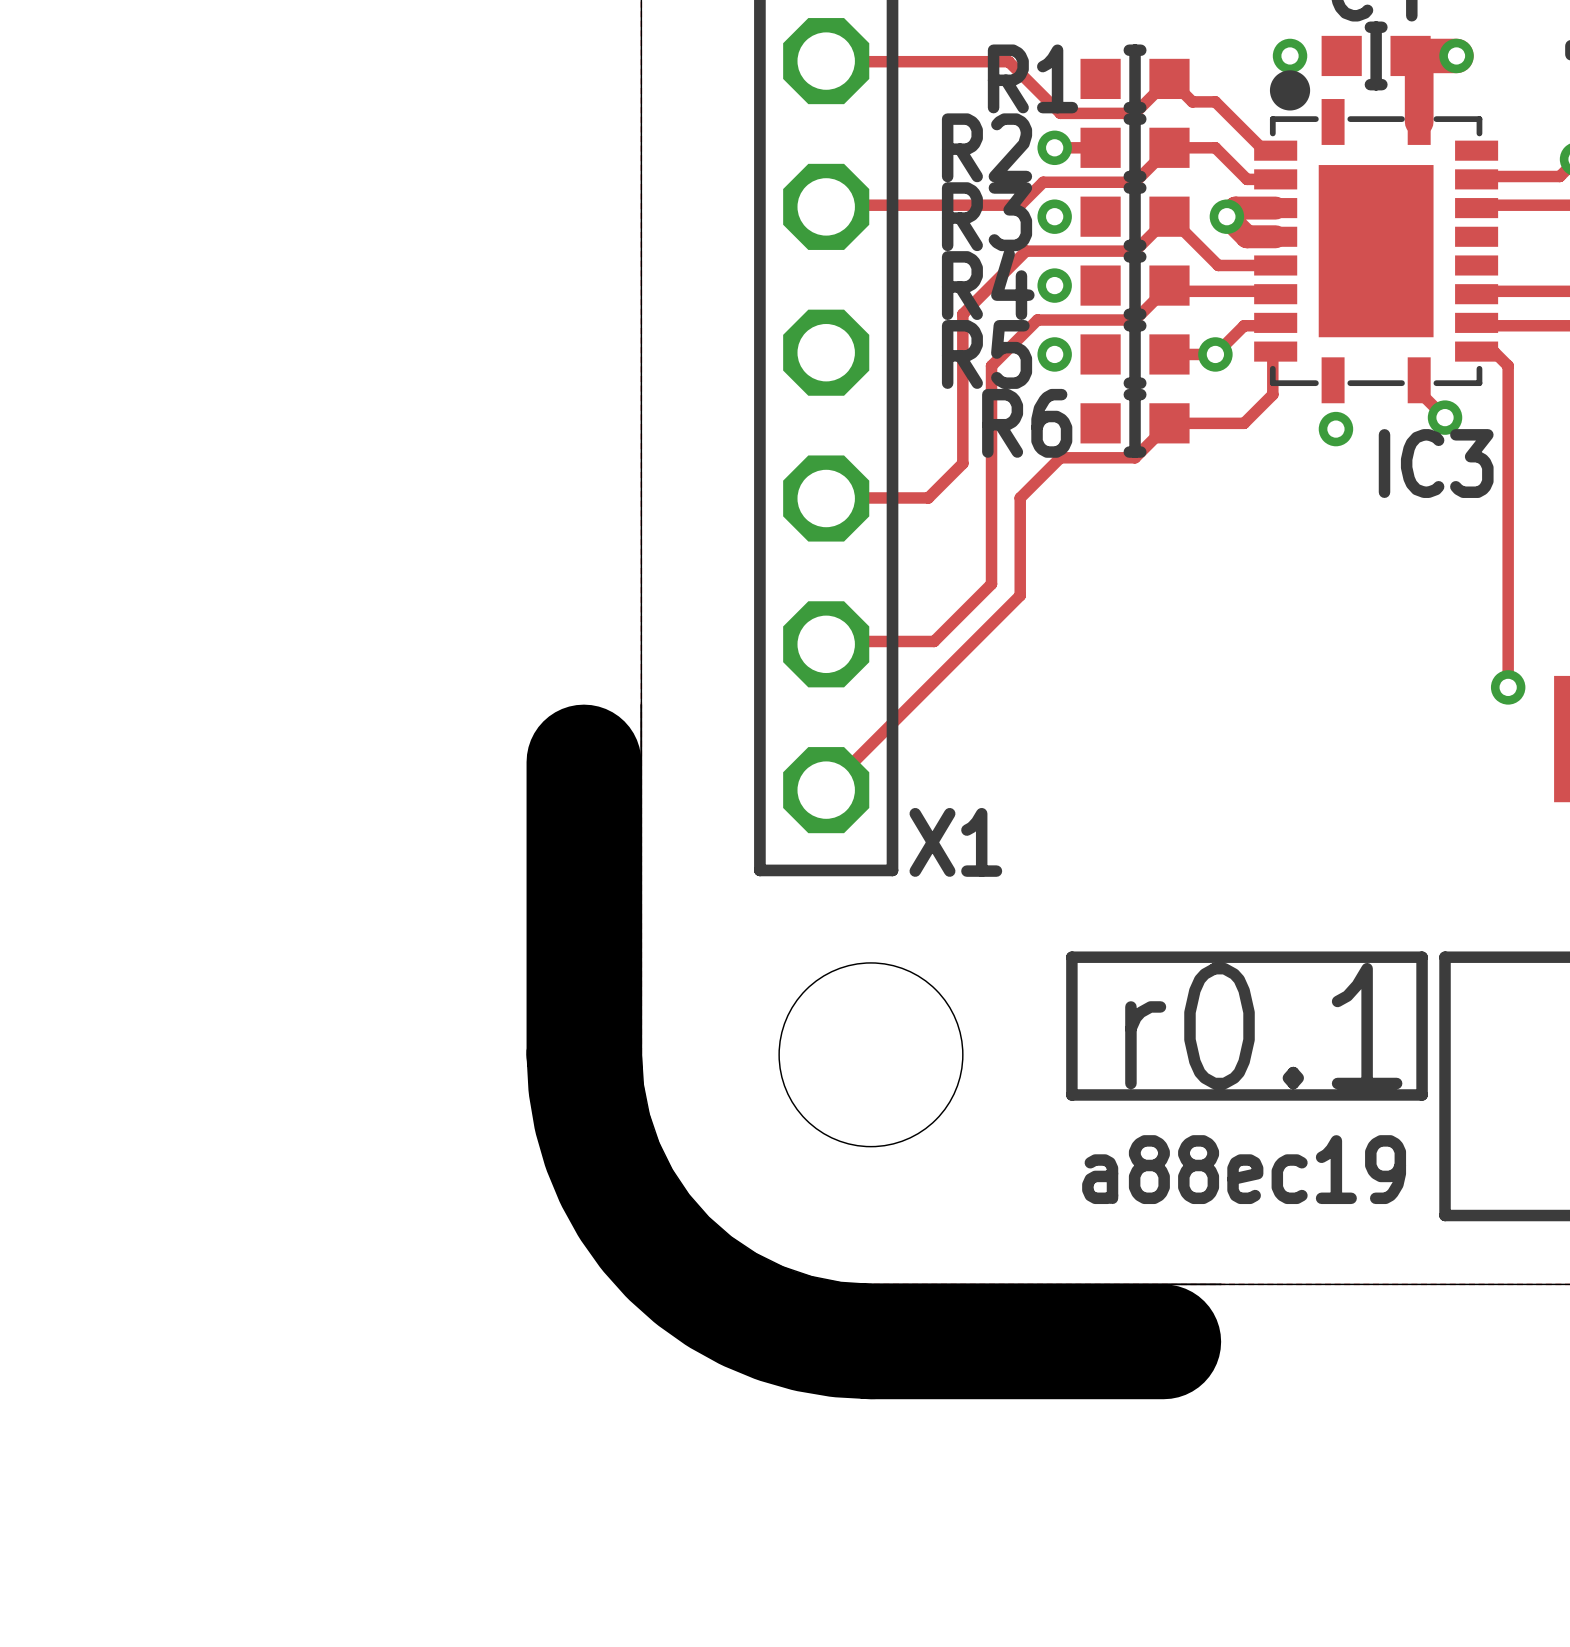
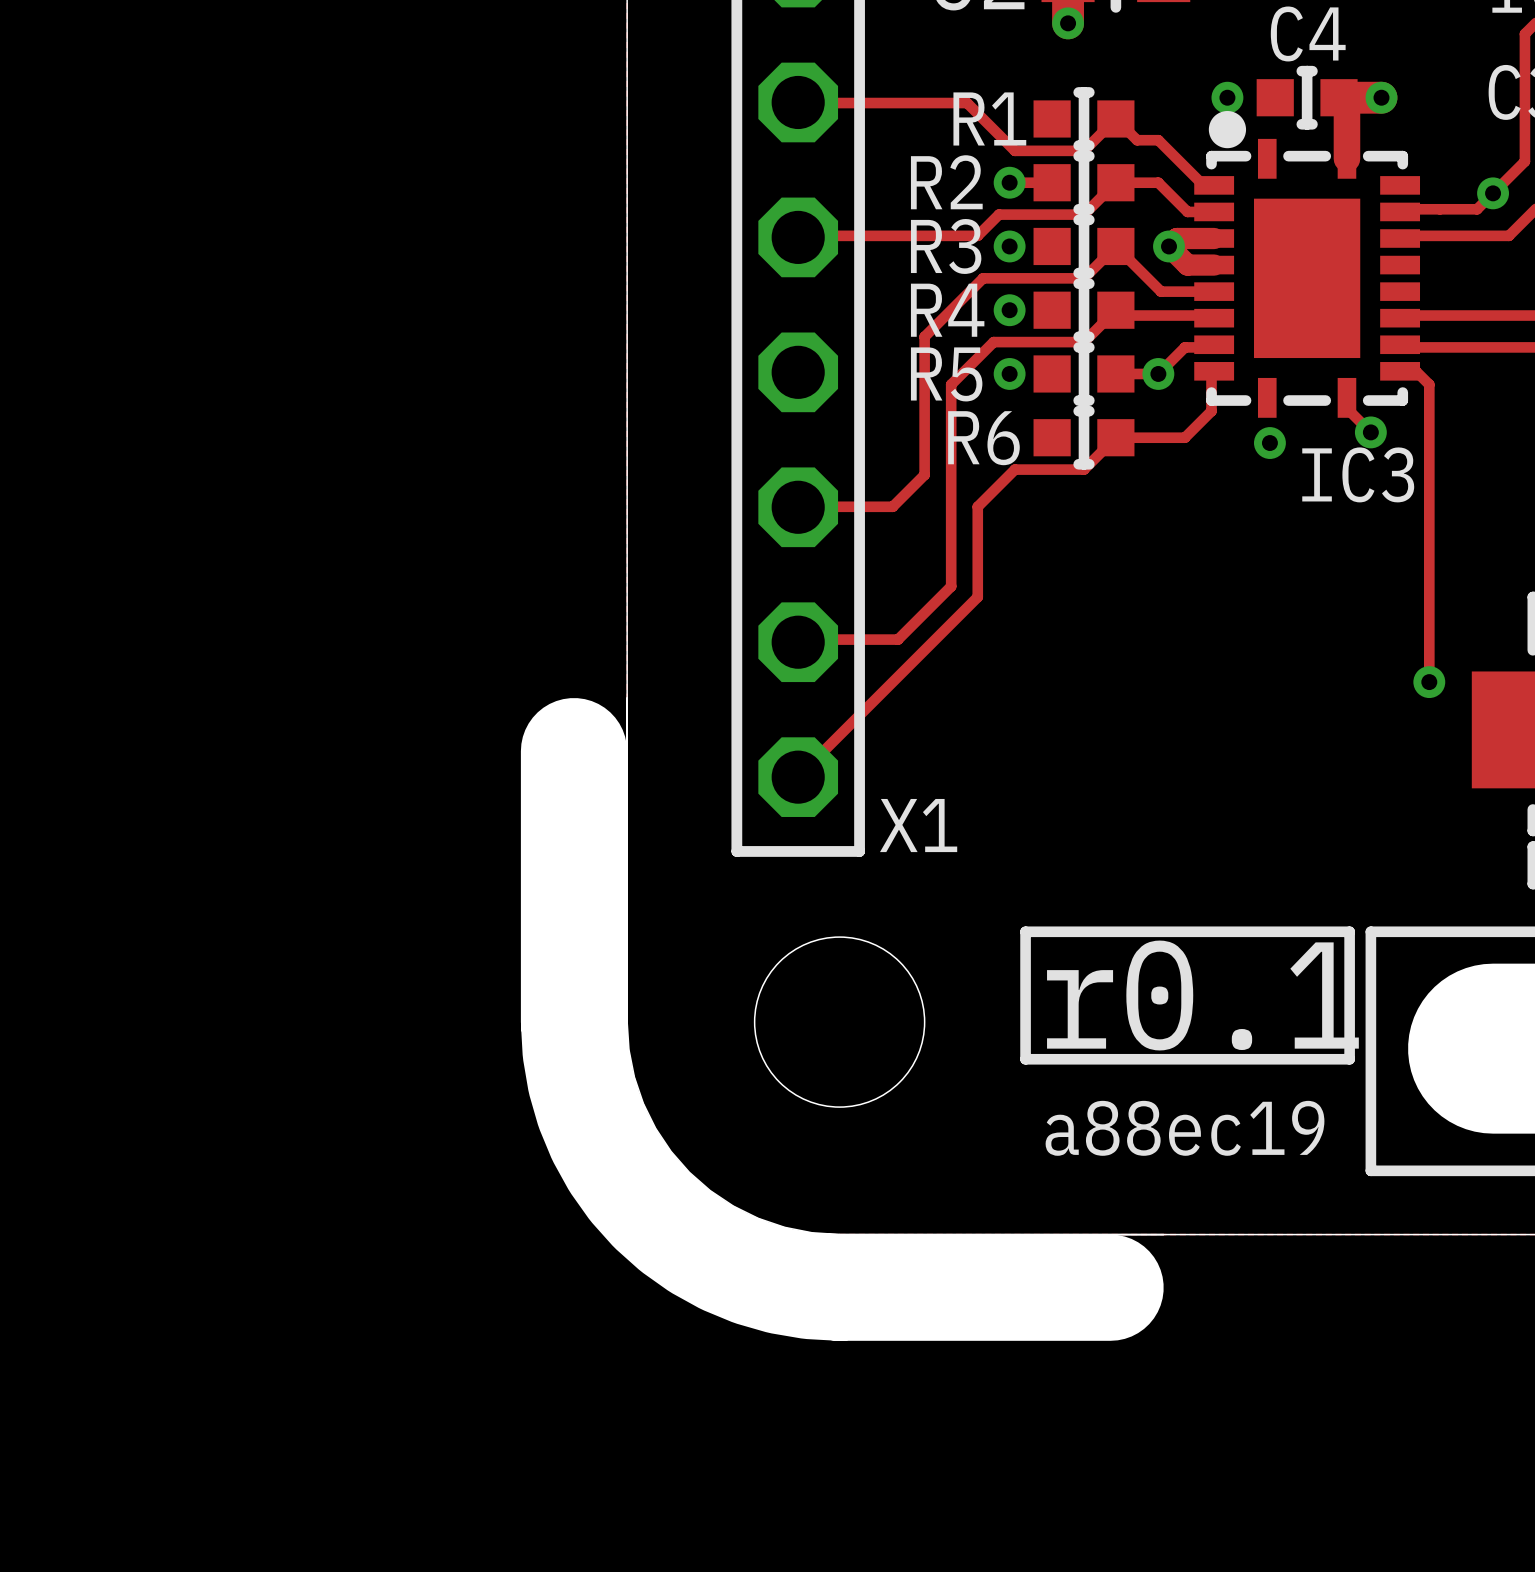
IC3 footprint: [1254, 70, 1499, 404] -> [1194, 111, 1421, 418]

